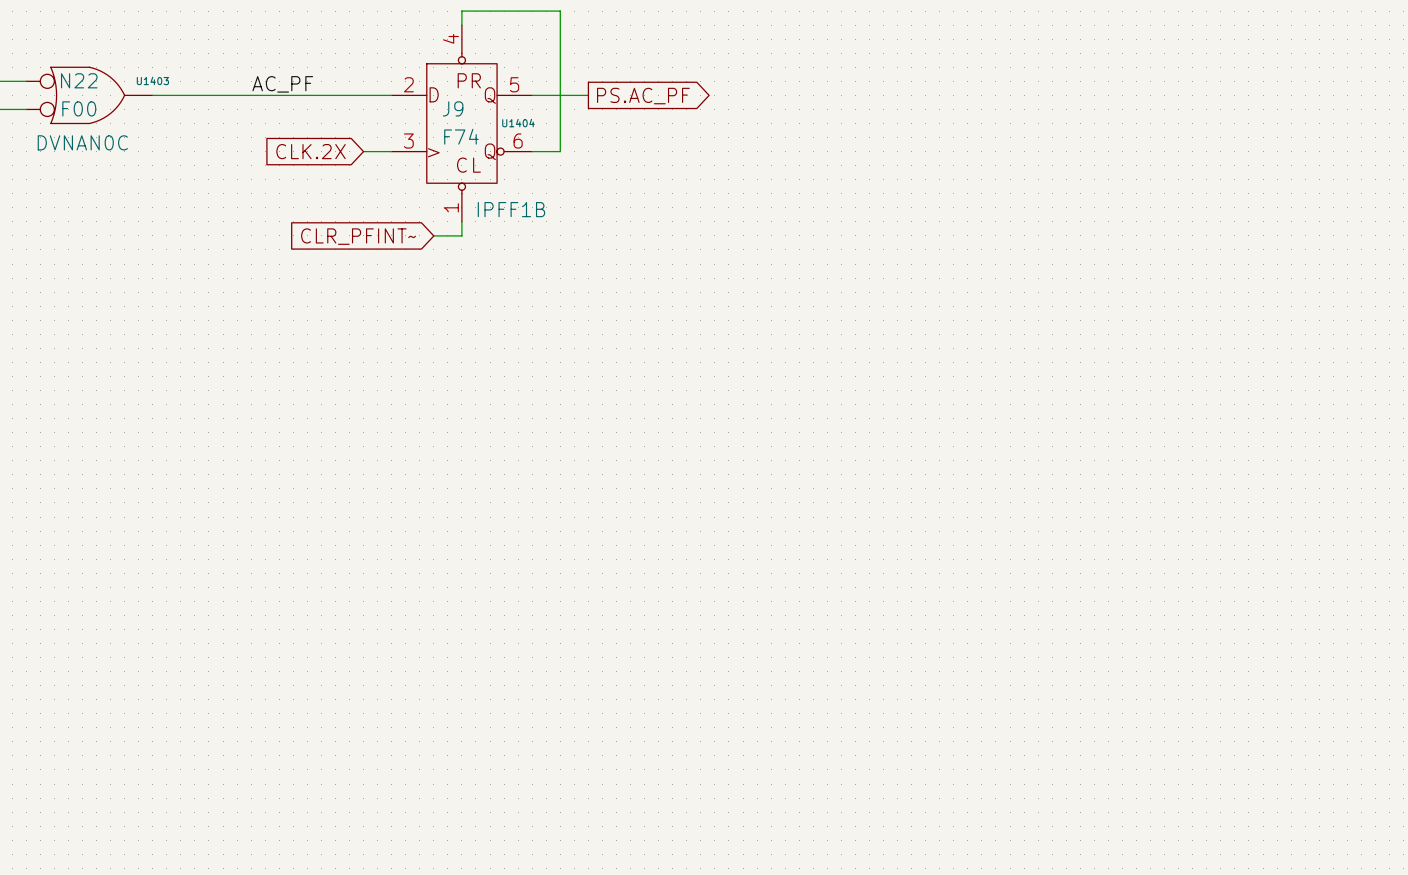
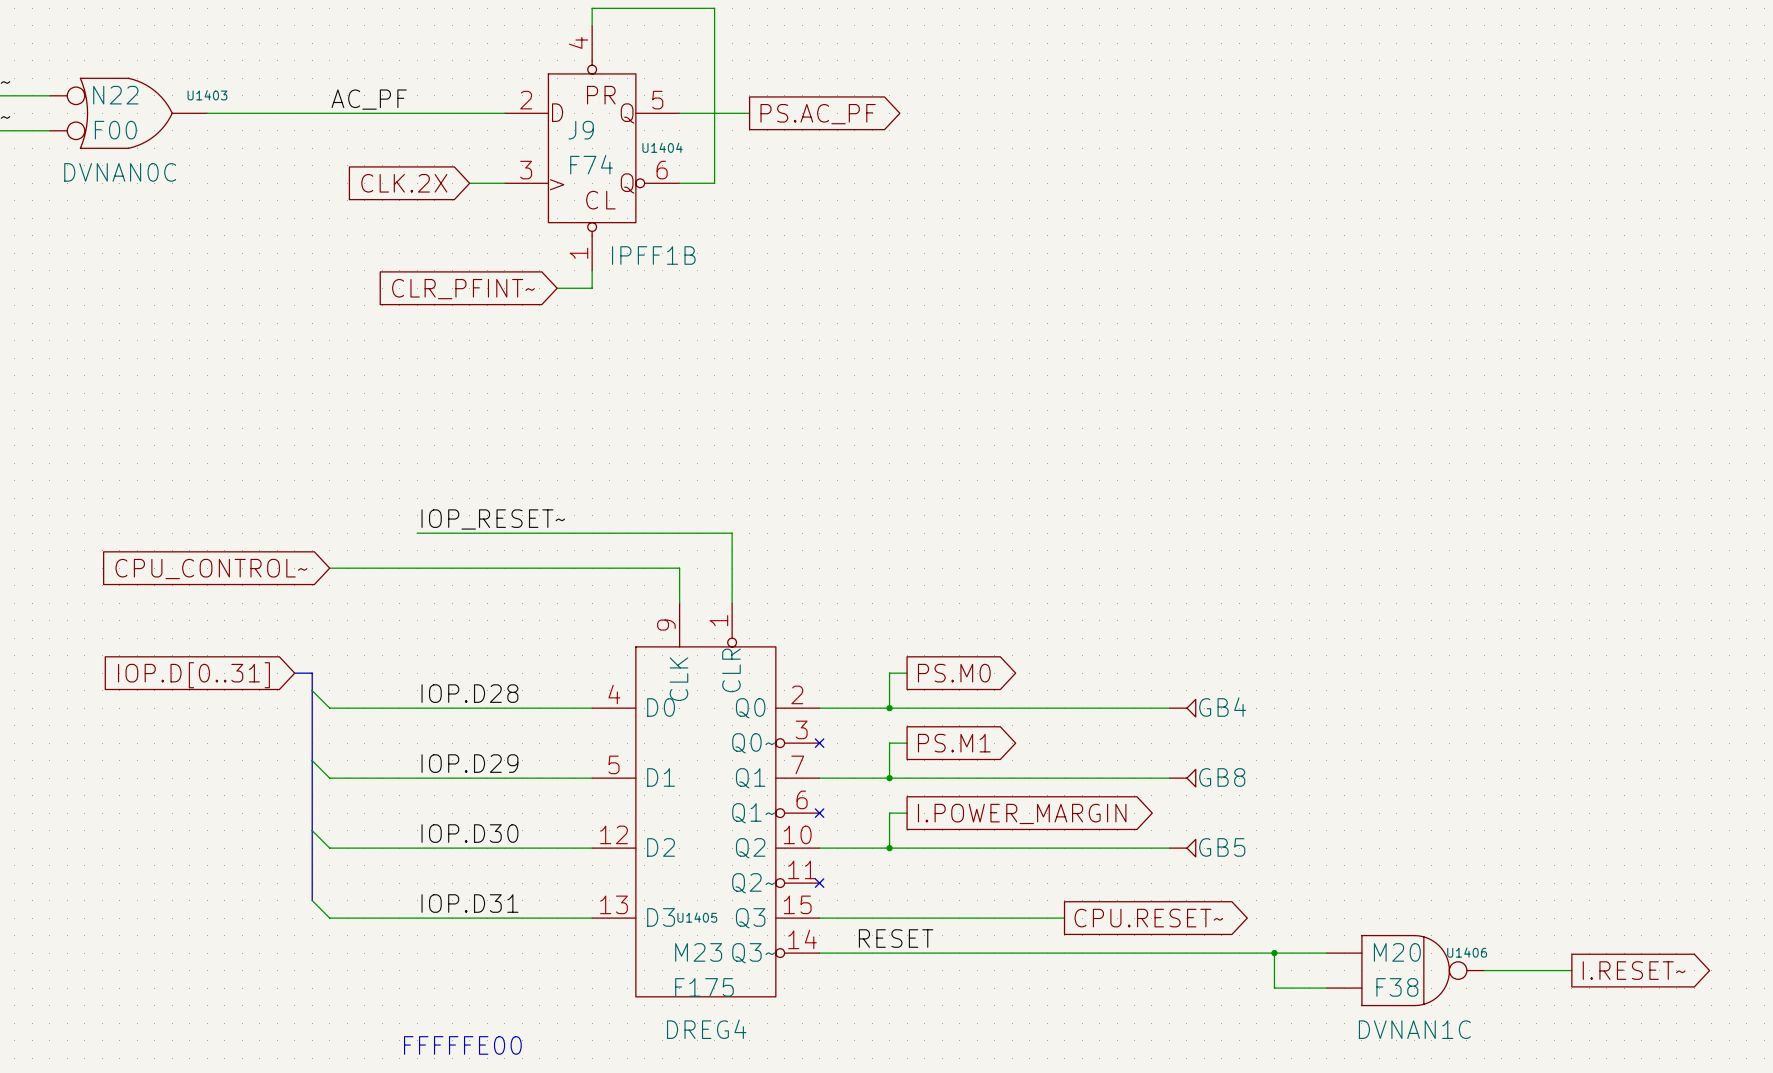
label: none -> IOP_RESET~ (493, 519)
wire: none -> (417, 533) (732, 533) (732, 603)
wire: none -> (329, 568) (679, 568) (679, 603)
global label: none -> CPU_CONTROL~ (211, 569)
bus: none -> (294, 673) (312, 673) (312, 900)
wire: none -> (907, 673) (889, 673) (889, 708)
global label: none -> PS.M0 (954, 673)
global label: none -> IOP.D[0..31] (193, 675)
wire: none -> (312, 690) (329, 708) (592, 708)
label: none -> IOP.D28 (469, 693)
wire: none -> (819, 708) (1169, 708)
junction: none -> (889, 708)
GB4: none -> (1182, 708)
no-connect mark: none -> (819, 743)
wire: none -> (907, 743) (889, 743) (889, 778)
global label: none -> PS.M1 (954, 743)
wire: none -> (312, 760) (329, 778) (592, 778)
label: none -> IOP.D29 (469, 763)
wire: none -> (819, 778) (1169, 778)
junction: none -> (889, 778)
GB8: none -> (1182, 778)
U1405: none -> F175 (705, 799)
no-connect mark: none -> (819, 813)
wire: none -> (907, 813) (889, 813) (889, 848)
global label: none -> I.POWER_MARGIN (1022, 813)
wire: none -> (312, 830) (329, 848) (592, 848)
label: none -> IOP.D30 (469, 833)
wire: none -> (819, 848) (1169, 848)
junction: none -> (889, 848)
GB5: none -> (1182, 848)
no-connect mark: none -> (819, 883)
wire: none -> (312, 900) (329, 918) (592, 918)
label: none -> IOP.D31 (469, 903)
wire: none -> (819, 918) (1064, 918)
global label: none -> CPU.RESET~ (1148, 918)
label: none -> RESET (896, 938)
wire: none -> (819, 953) (1326, 953)
wire: none -> (1274, 953) (1274, 988) (1326, 988)
junction: none -> (1274, 953)
U1406: none -> F38 (1405, 970)
wire: none -> (1484, 970) (1571, 970)
global label: none -> I.RESET~ (1634, 970)
text: none -> FFFFFE00 (462, 1045)

